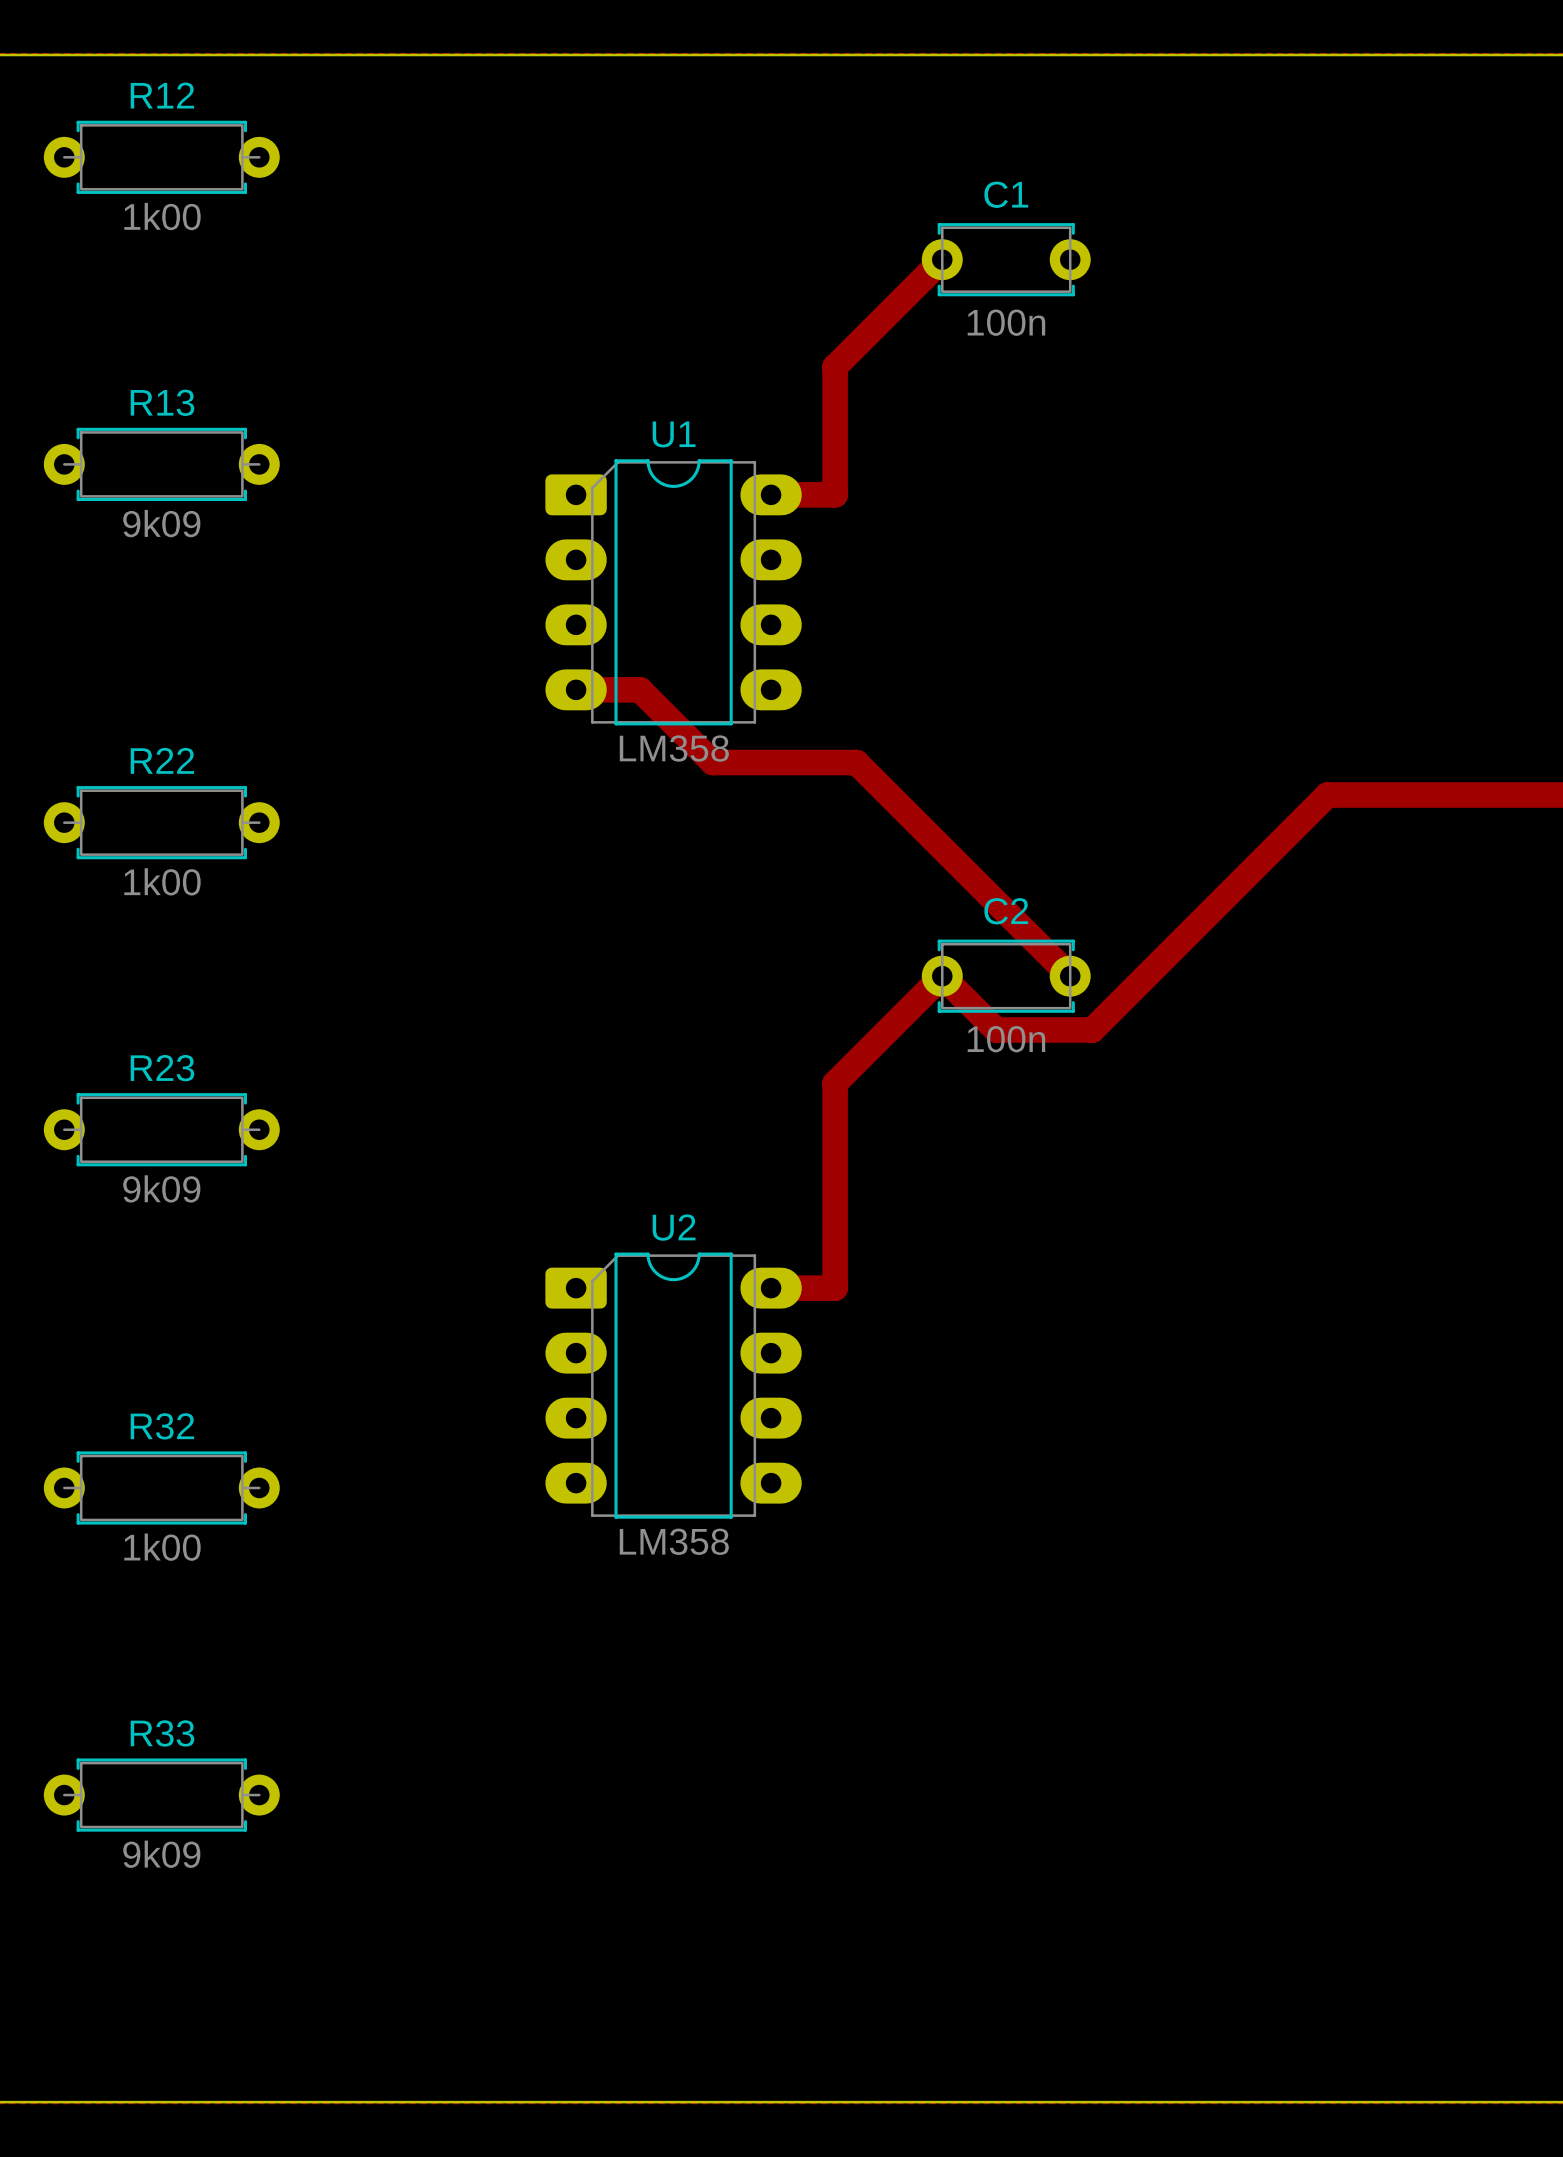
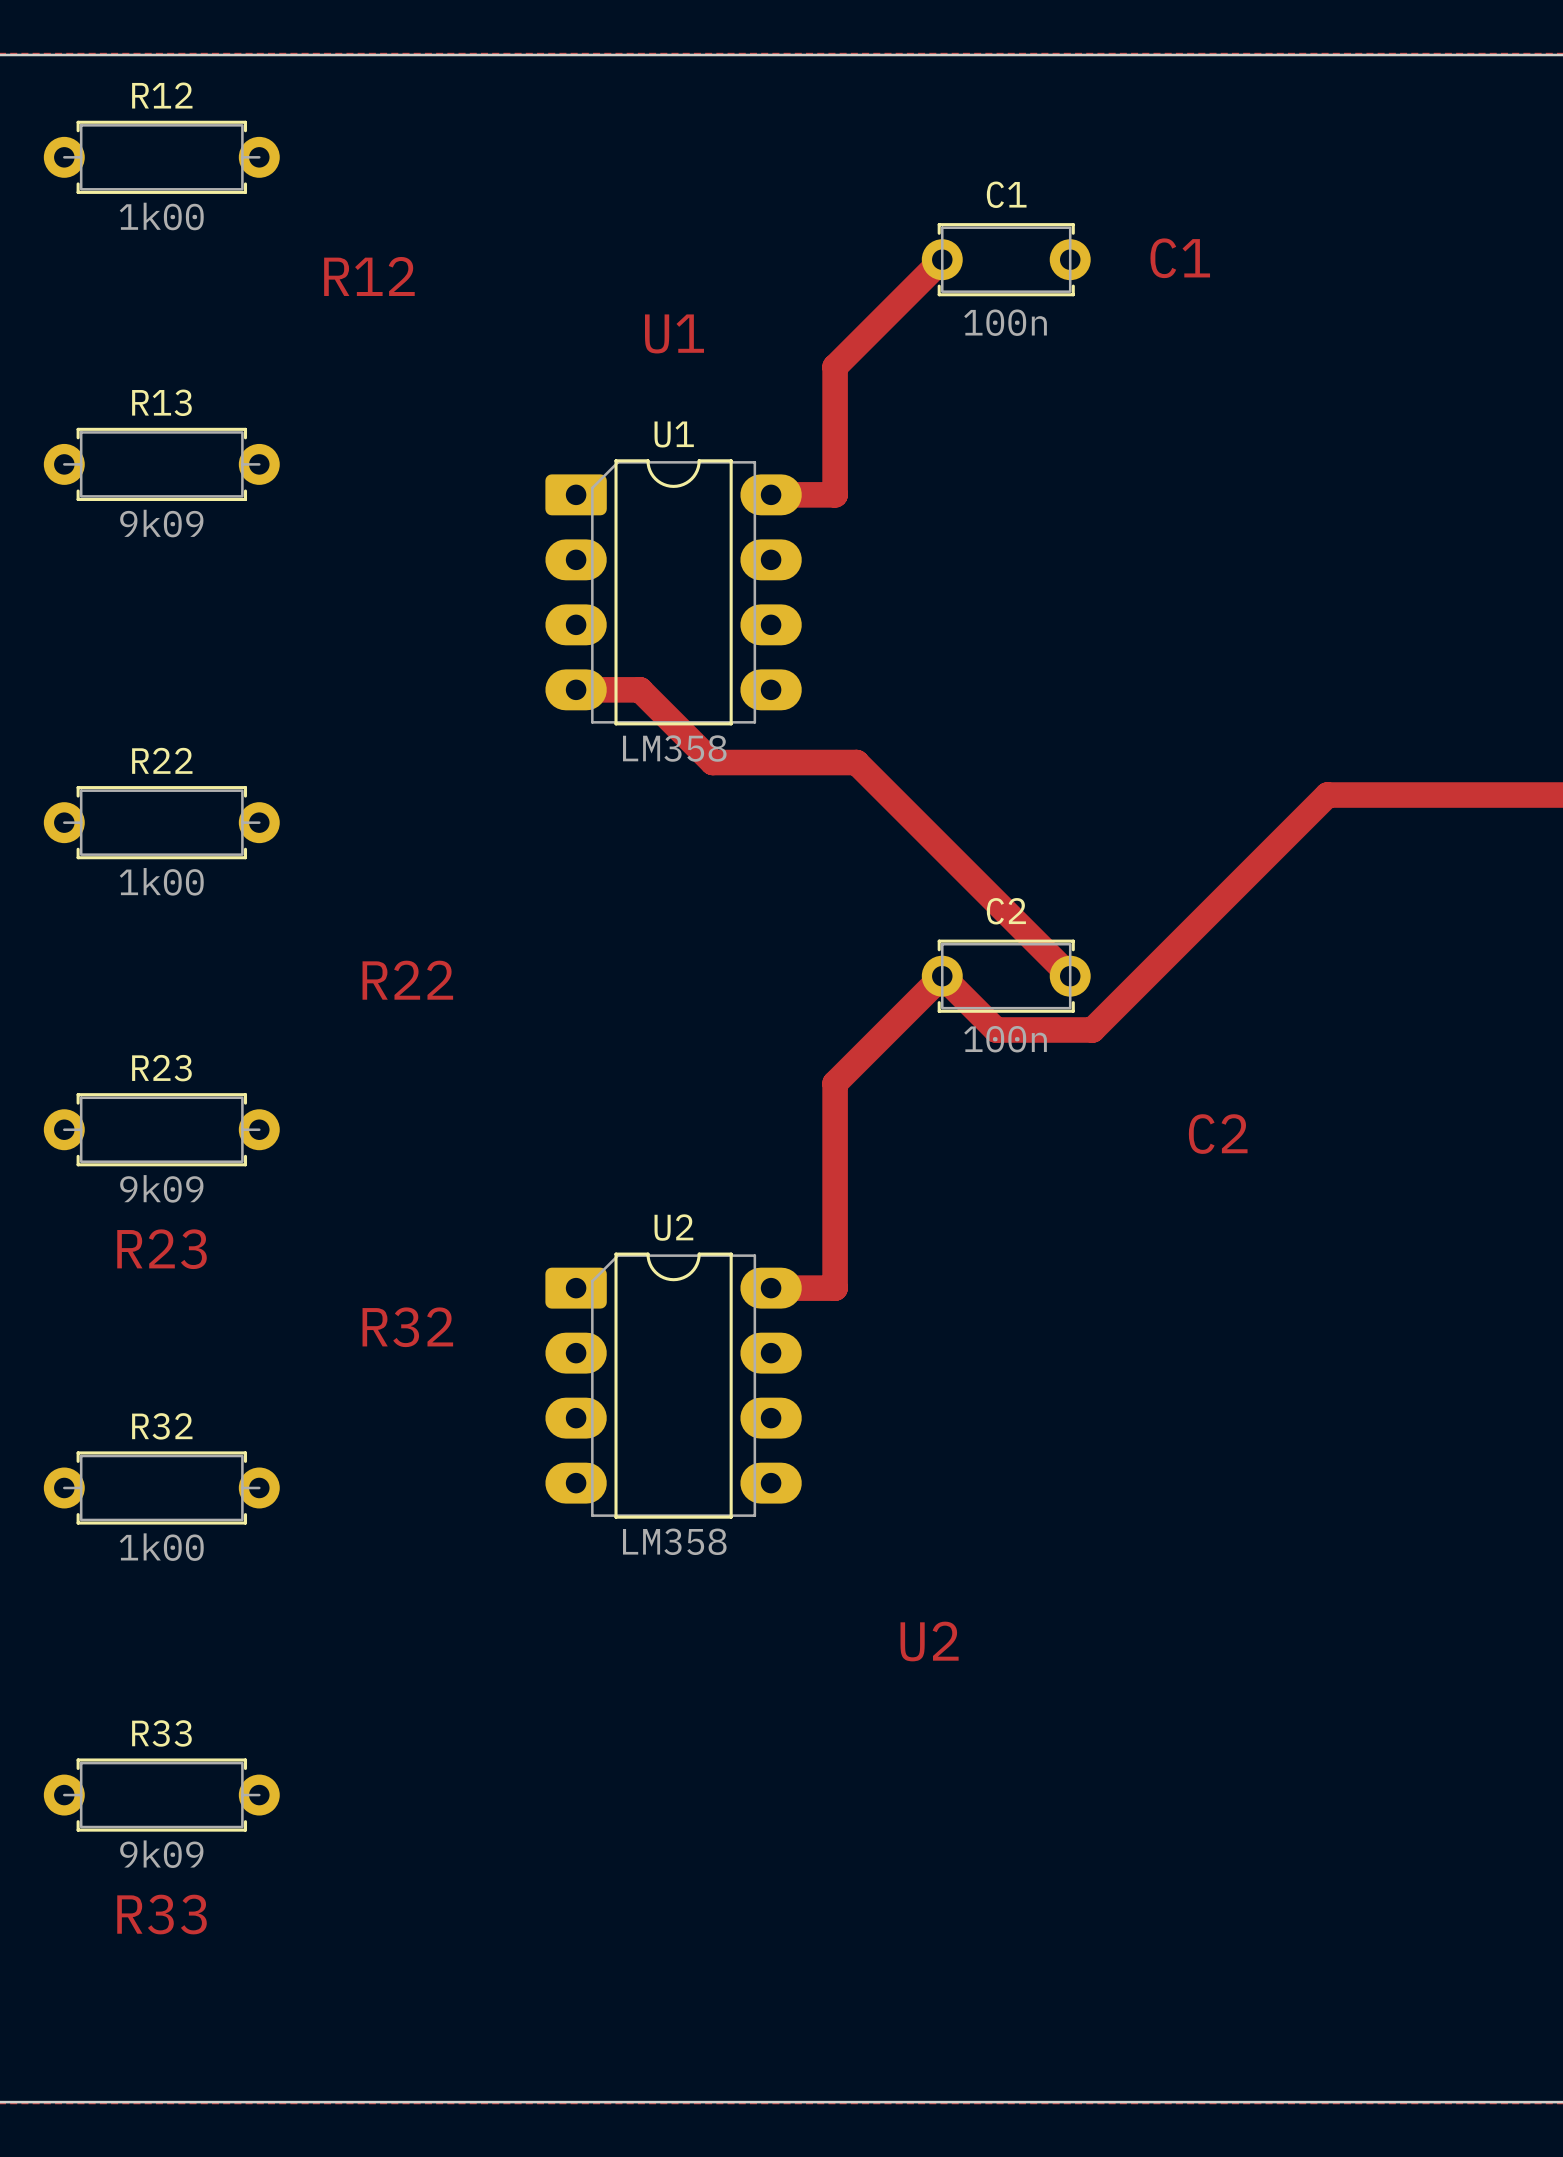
text: none -> C1 (1180, 258)
text: none -> R12 (369, 276)
text: none -> U1 (674, 333)
text: none -> R22 (407, 980)
text: none -> C2 (1218, 1134)
text: none -> R23 (162, 1249)
text: none -> R32 (407, 1327)
text: none -> U2 (929, 1641)
text: none -> R33 (162, 1914)

